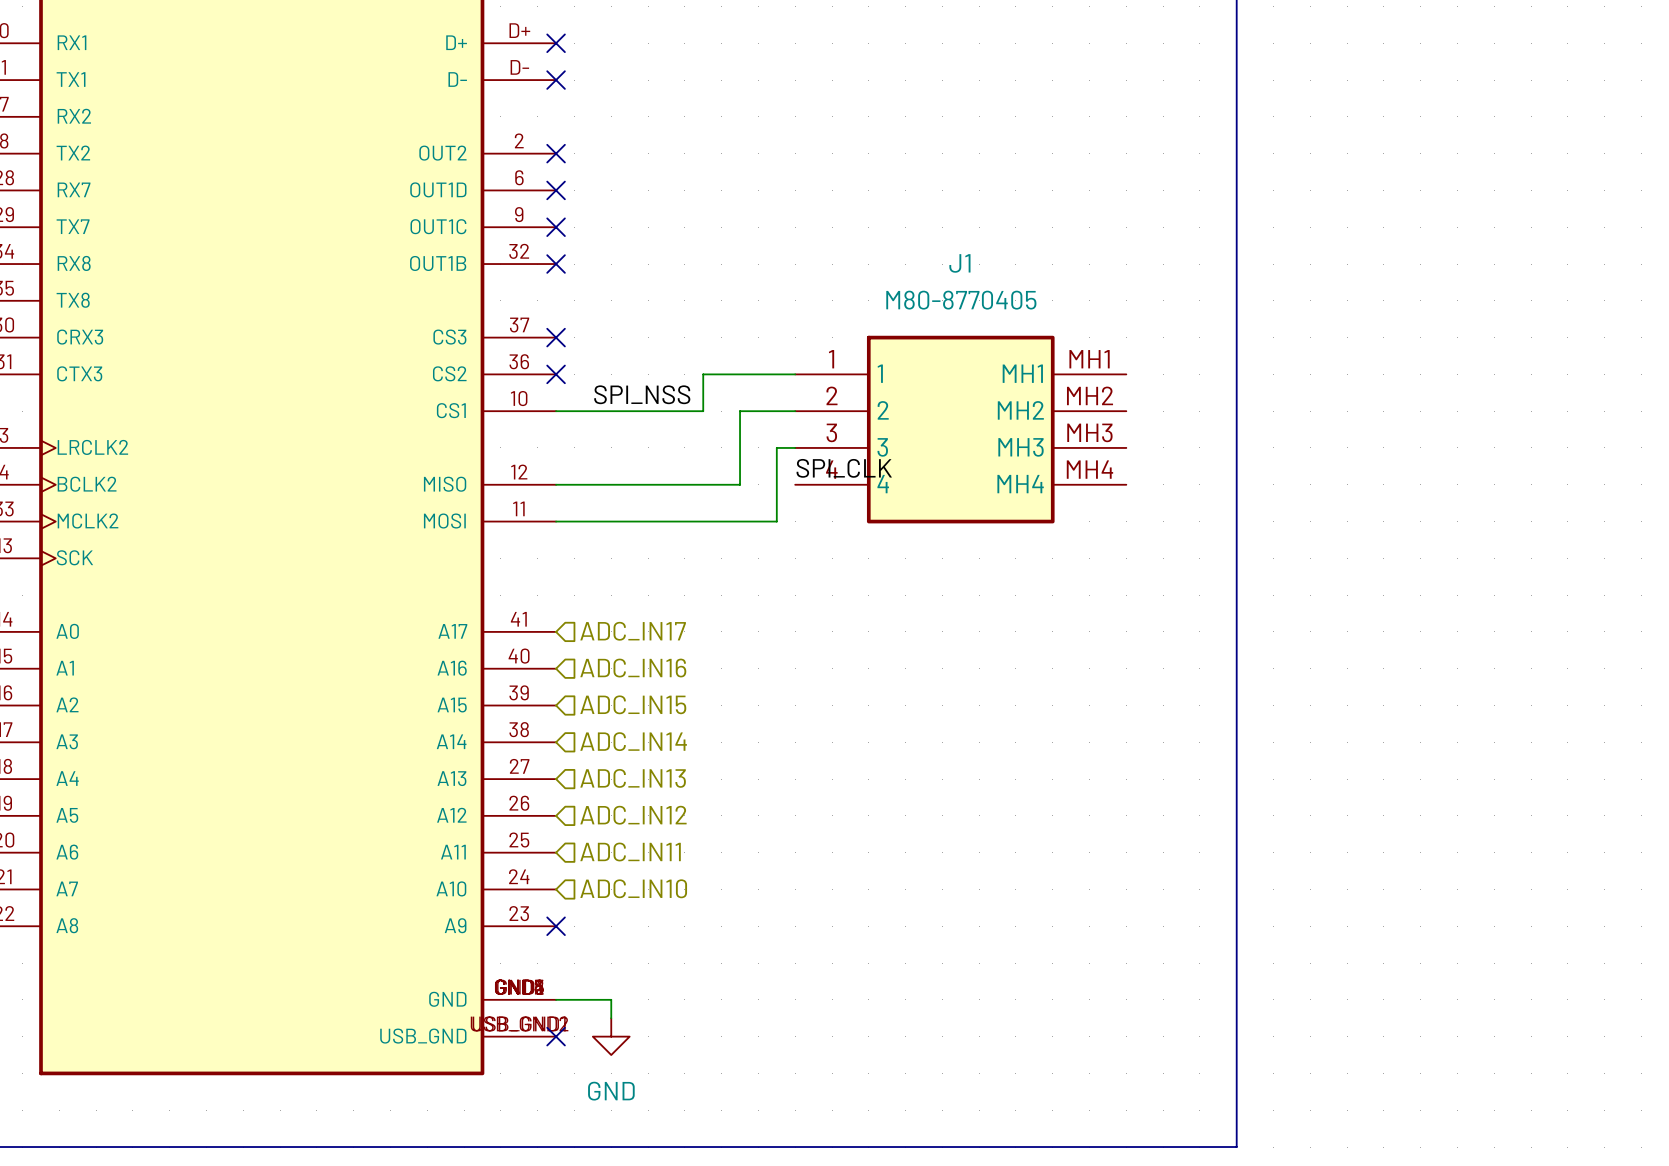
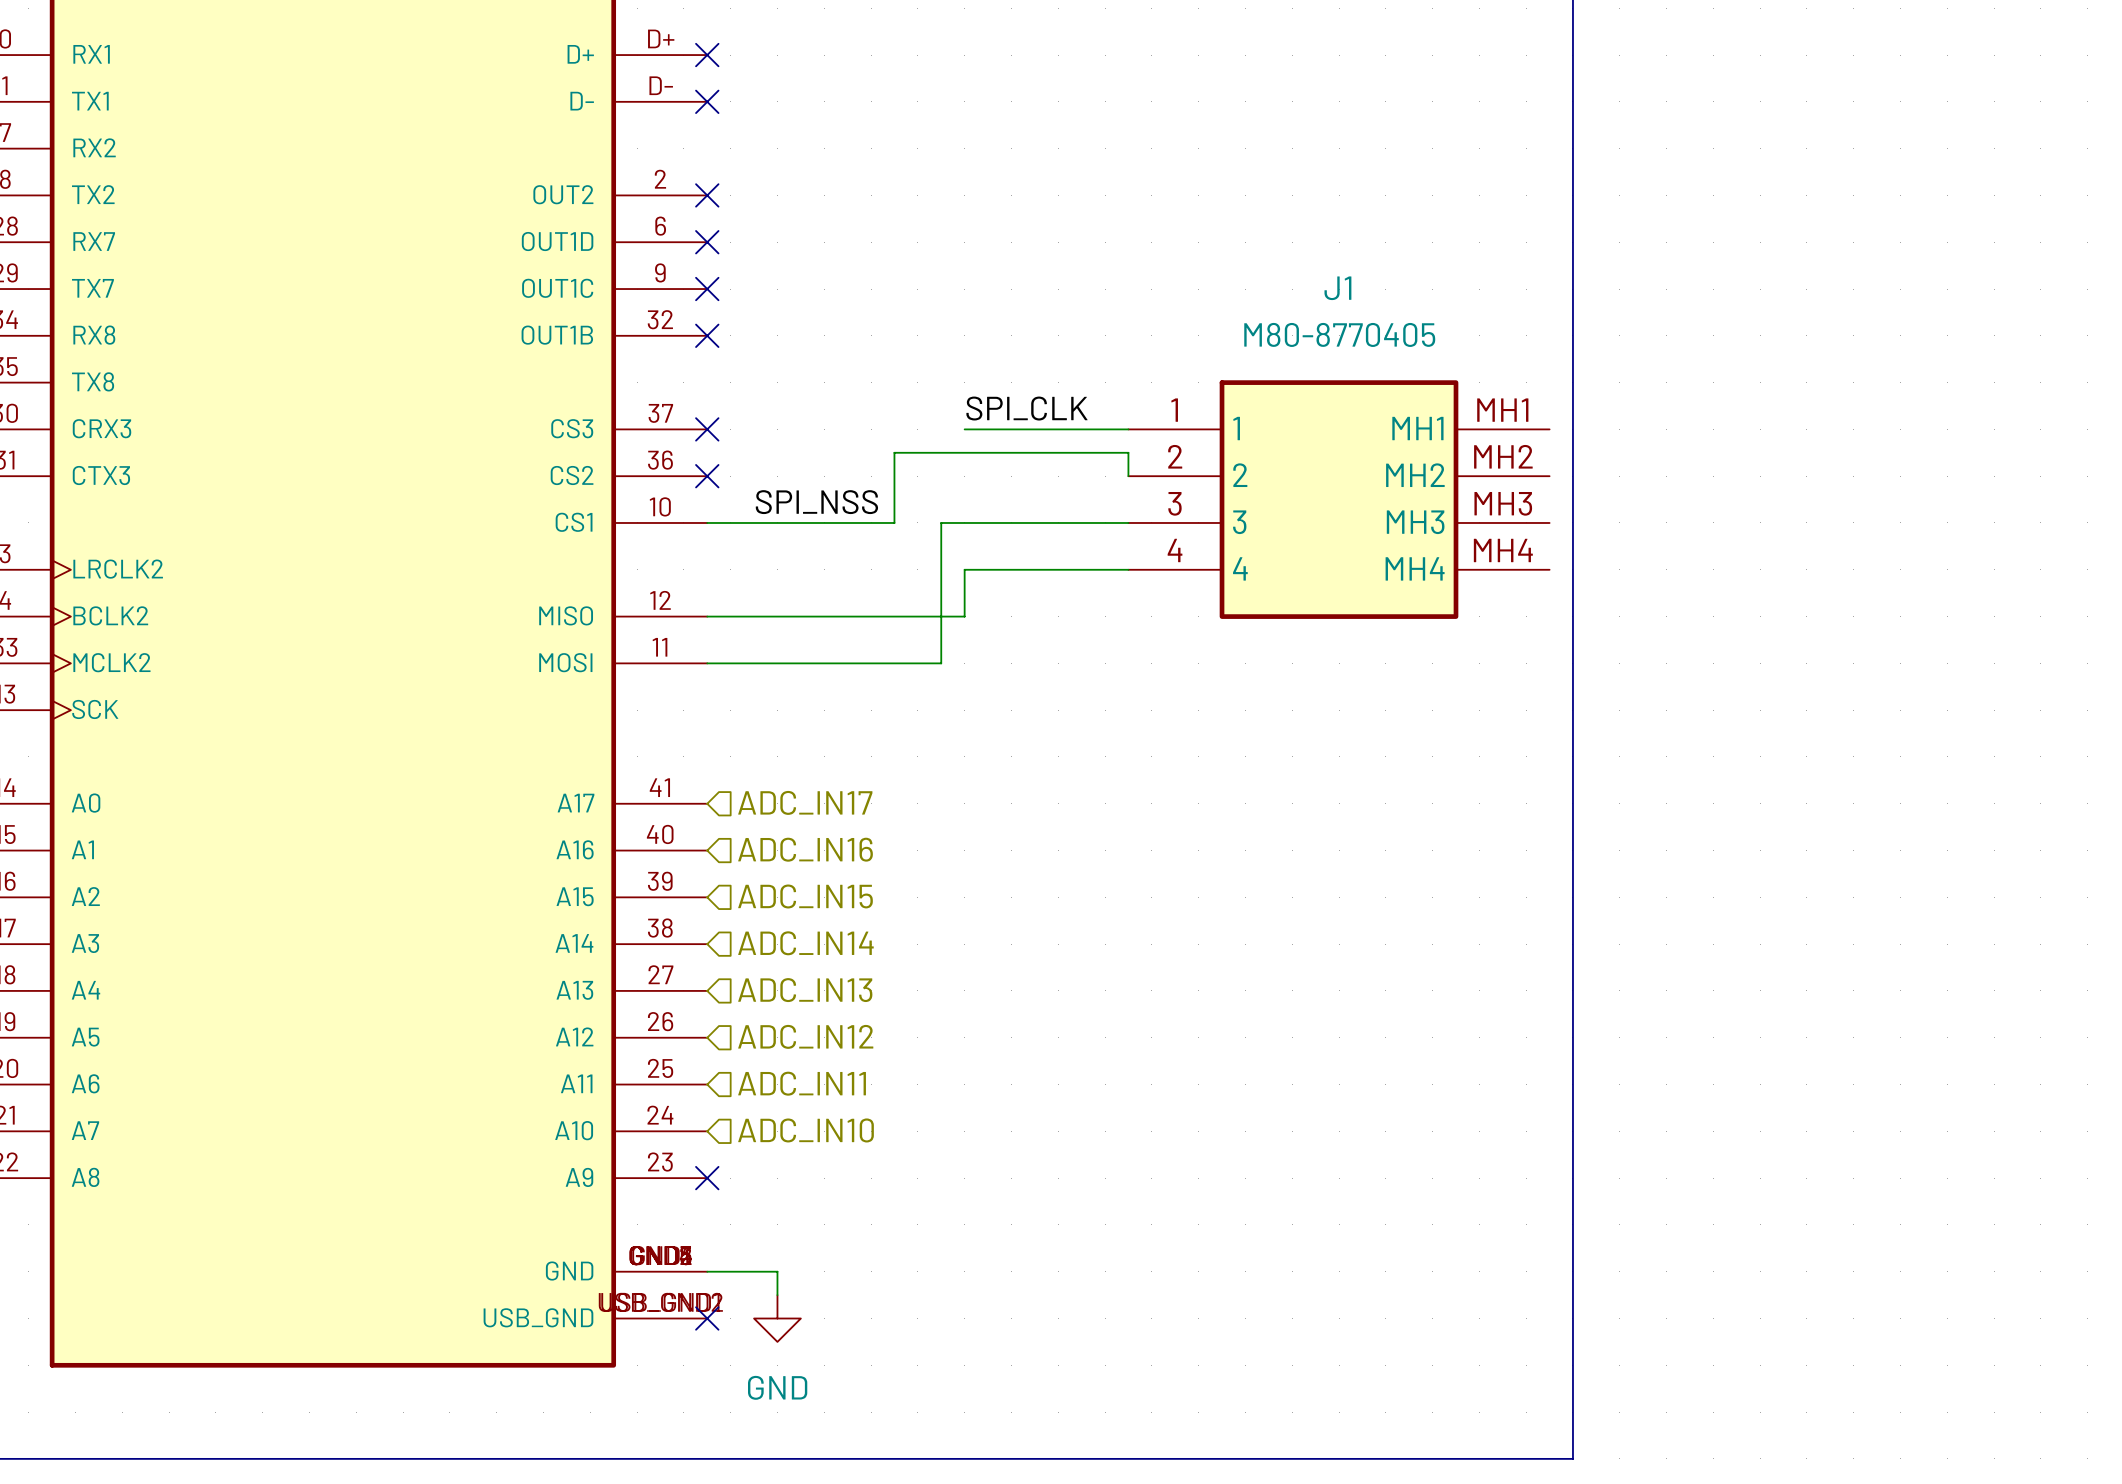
wire: none -> (964, 429) (1128, 429)
wire: (703, 374) (795, 374) -> (894, 476) (894, 452) (1128, 452) (1128, 476)
J1 position: (960, 429) -> (1339, 499)
wire: (776, 447) (776, 521) (740, 521) -> (988, 569) (964, 569) (964, 616) (941, 616) (941, 663)
label position: SPI_CLK (844, 468) -> SPI_CLK (1026, 408)

